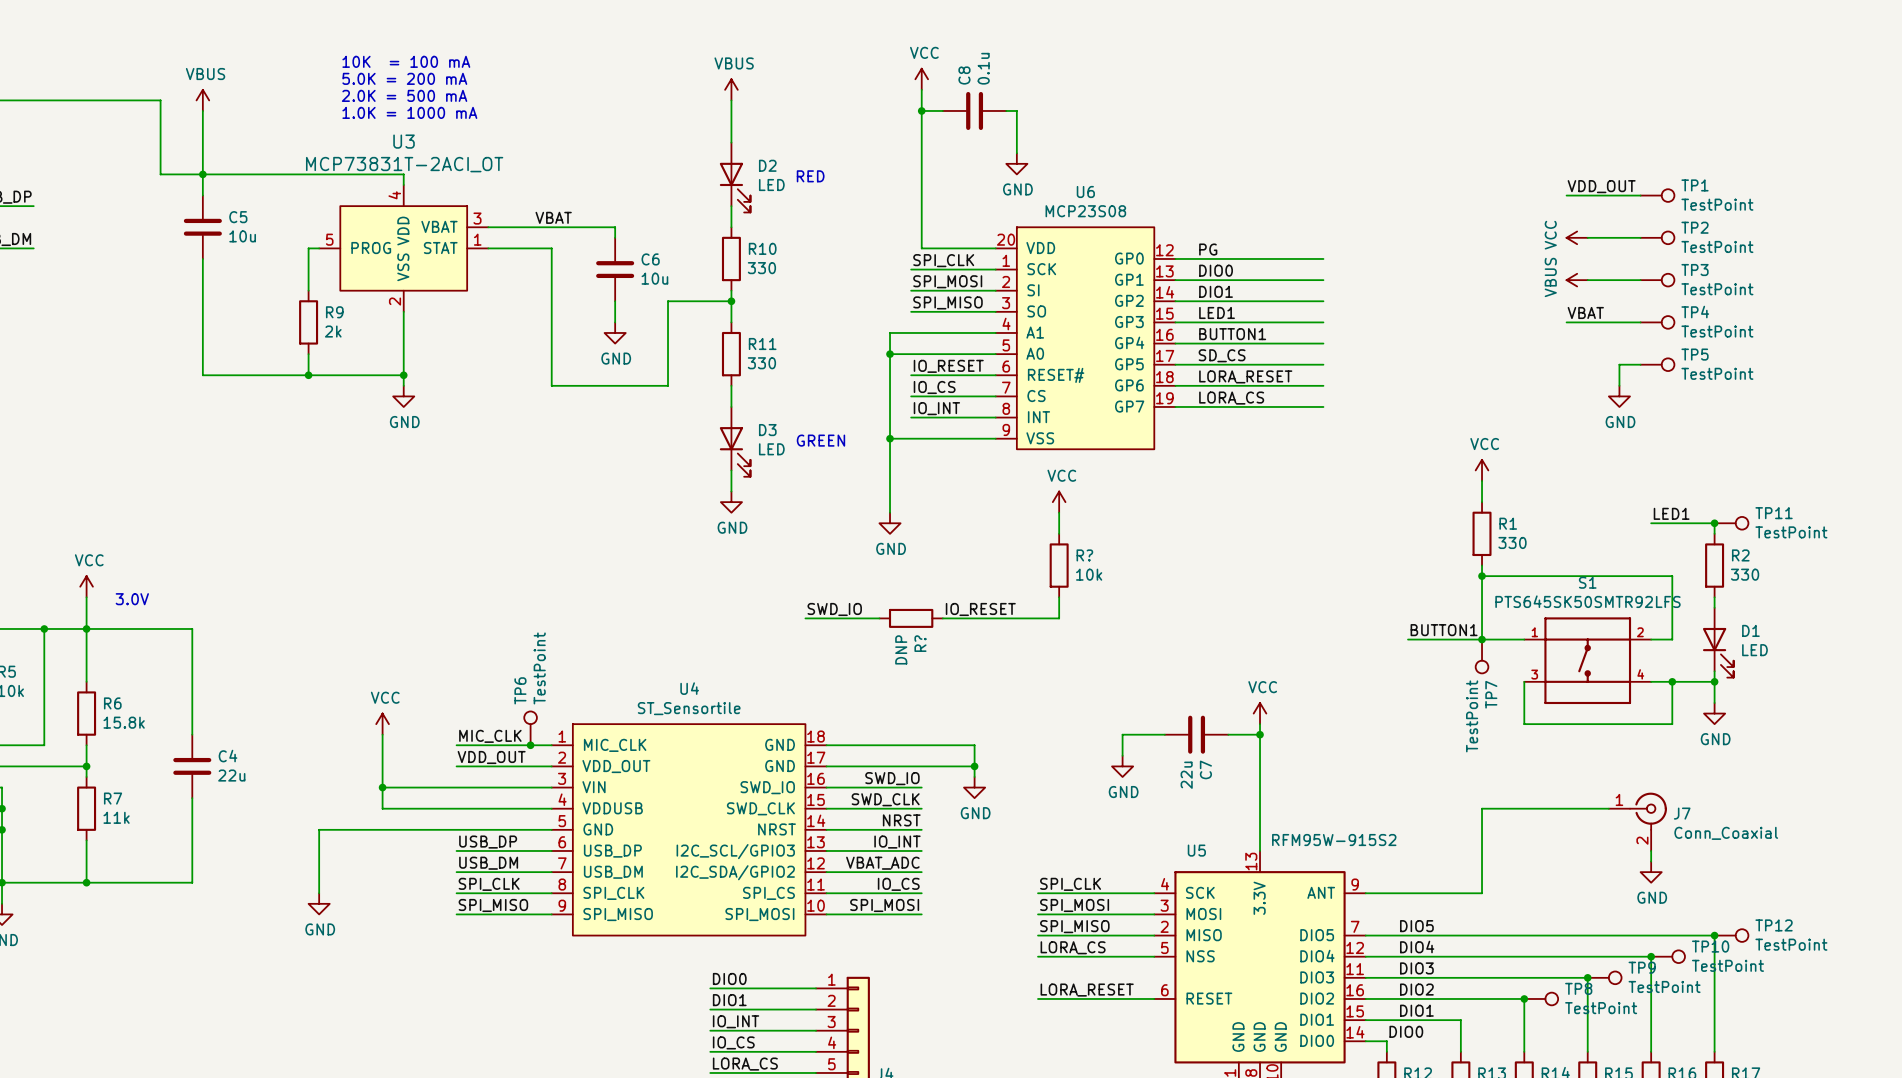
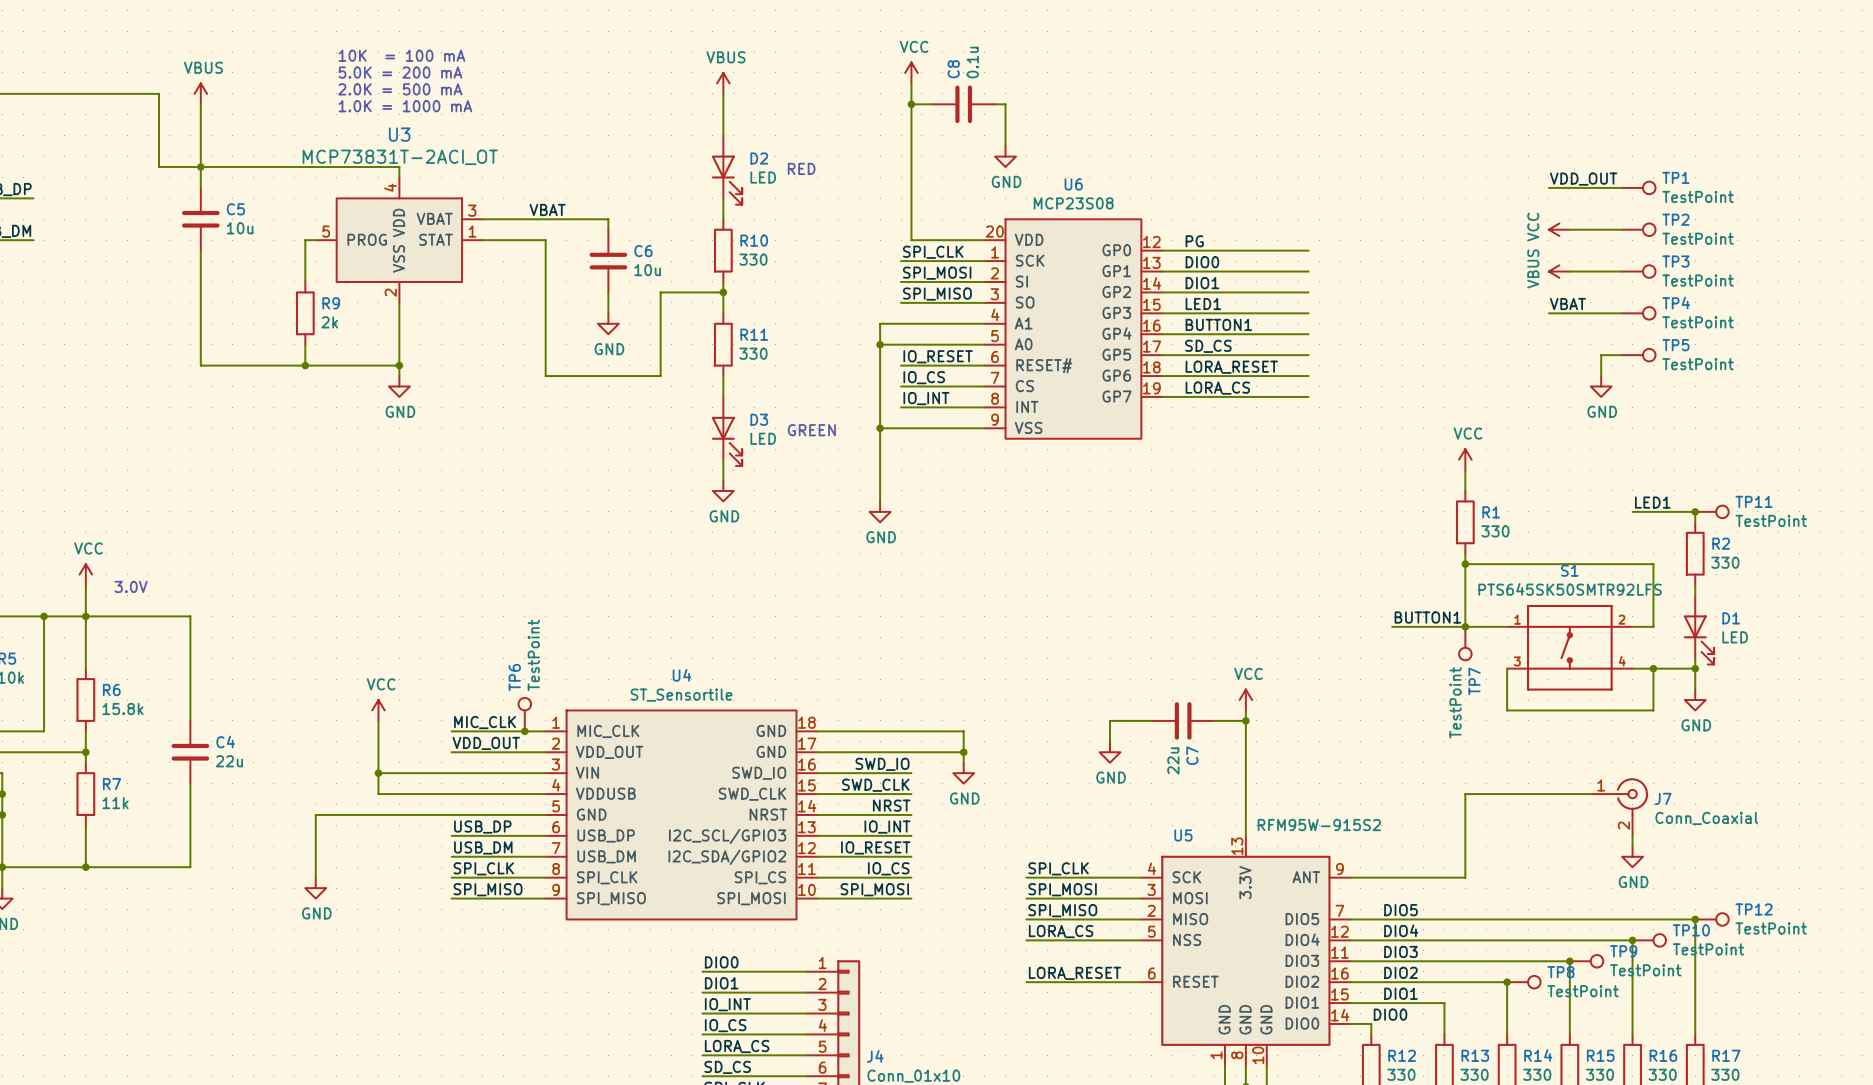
power symbol: VCC (1059, 502) -> none
wire: (1059, 512) (1059, 533) -> none
R?: 10k (1059, 565) -> none
wire: (1059, 597) (1059, 618) (942, 618) -> none
label: SWD_IO (834, 609) -> none
label: IO_RESET (980, 609) -> none
wire: (805, 618) (879, 618) -> none
R?: DNP (911, 618) -> none
label: VBAT_ADC (882, 863) -> IO_RESET (875, 847)

